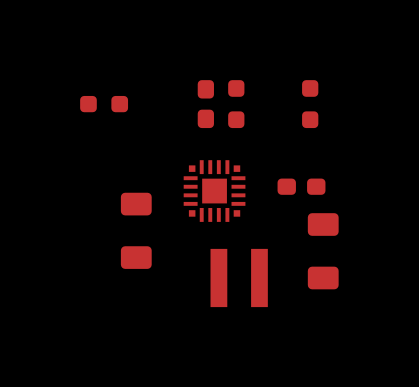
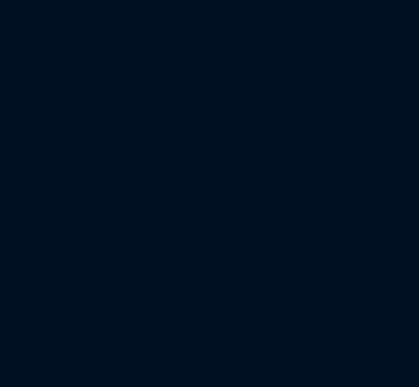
part: (104, 104) -> none
part: (205, 104) -> none
part: (236, 104) -> none
part: (310, 104) -> none
part: (301, 186) -> none
part: (214, 191) -> none
part: (136, 230) -> none
part: (323, 251) -> none
part: (239, 277) -> none

